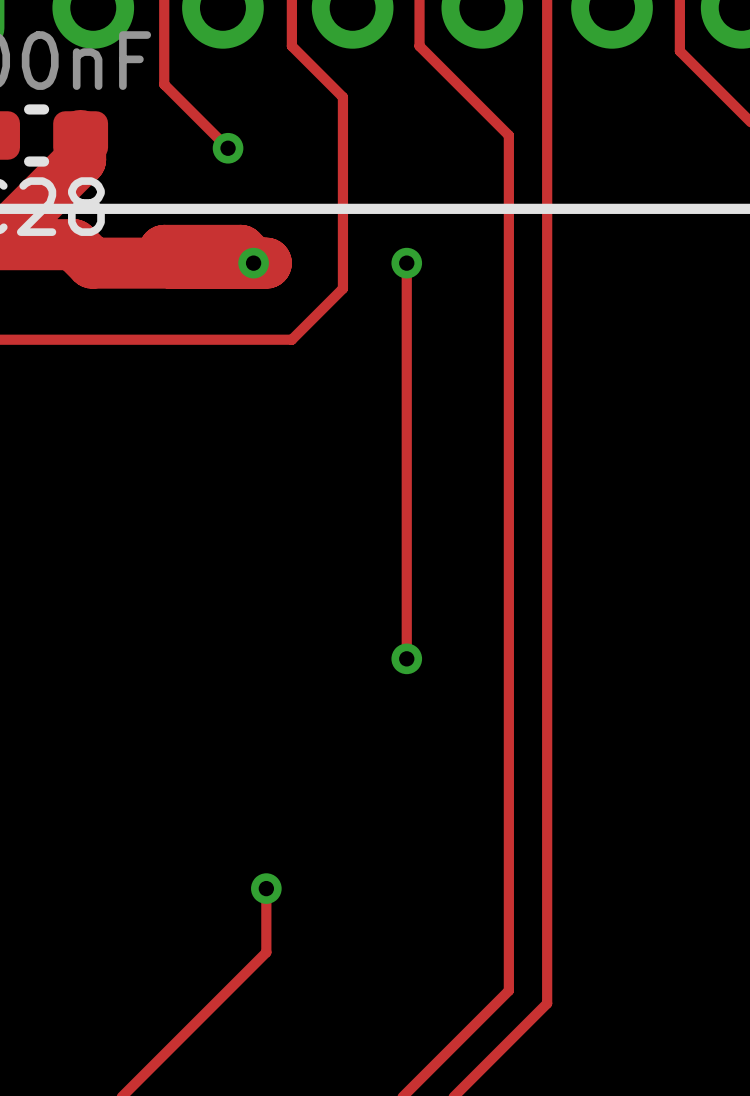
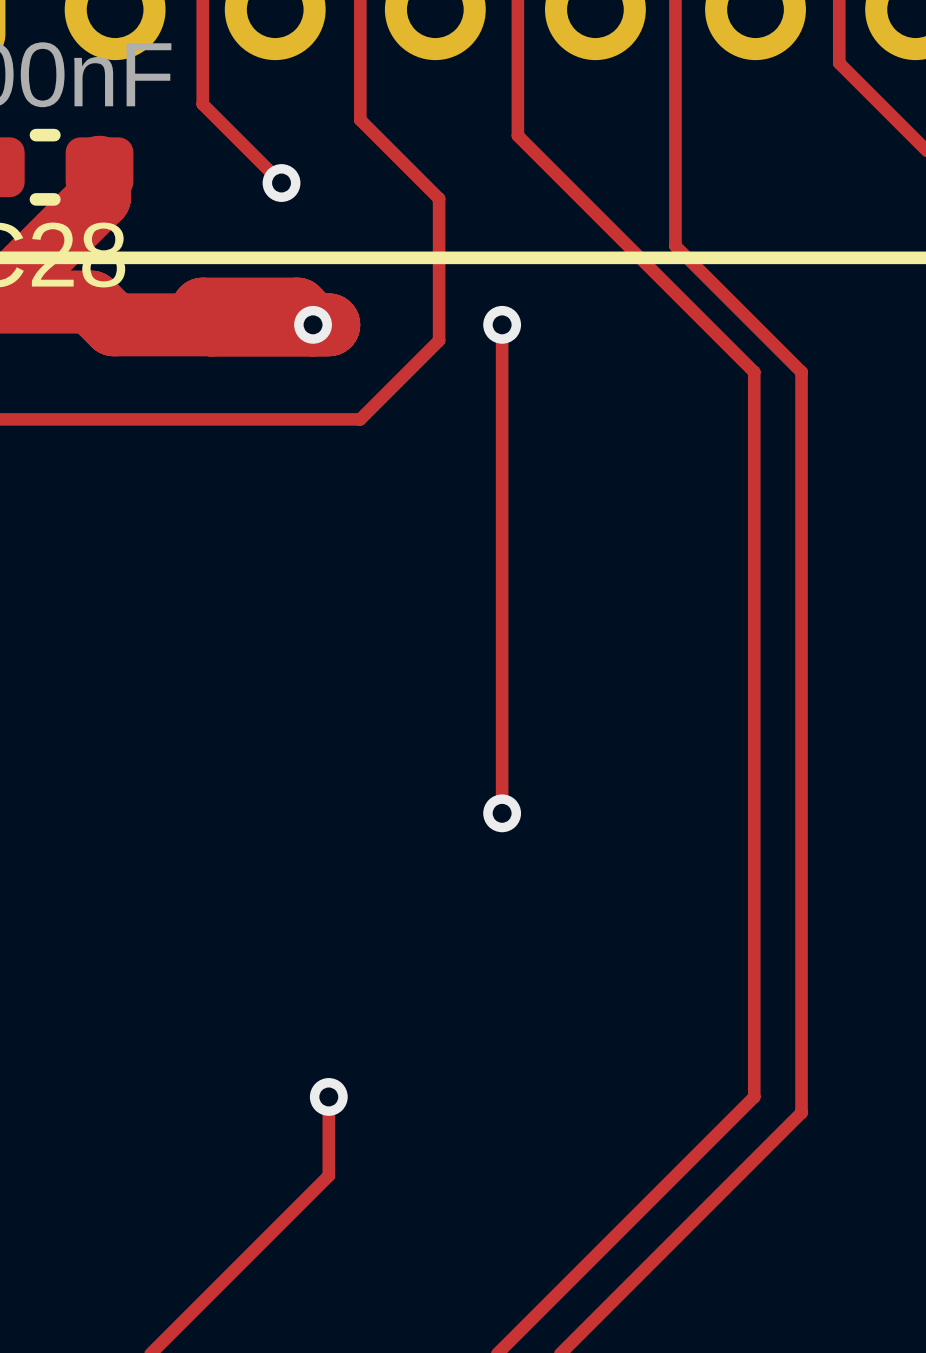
track: (291, 46) (342, 97) (342, 288) -> (360, 56) (360, 119) (439, 198) (439, 340) (423, 356)
track: (419, 46) (508, 135) (508, 990) -> (517, 56) (517, 135) (754, 372) (754, 1096) (628, 1223)
track: (547, 199) (547, 1003) -> (675, 246) (801, 372) (801, 1112) (675, 1238)

